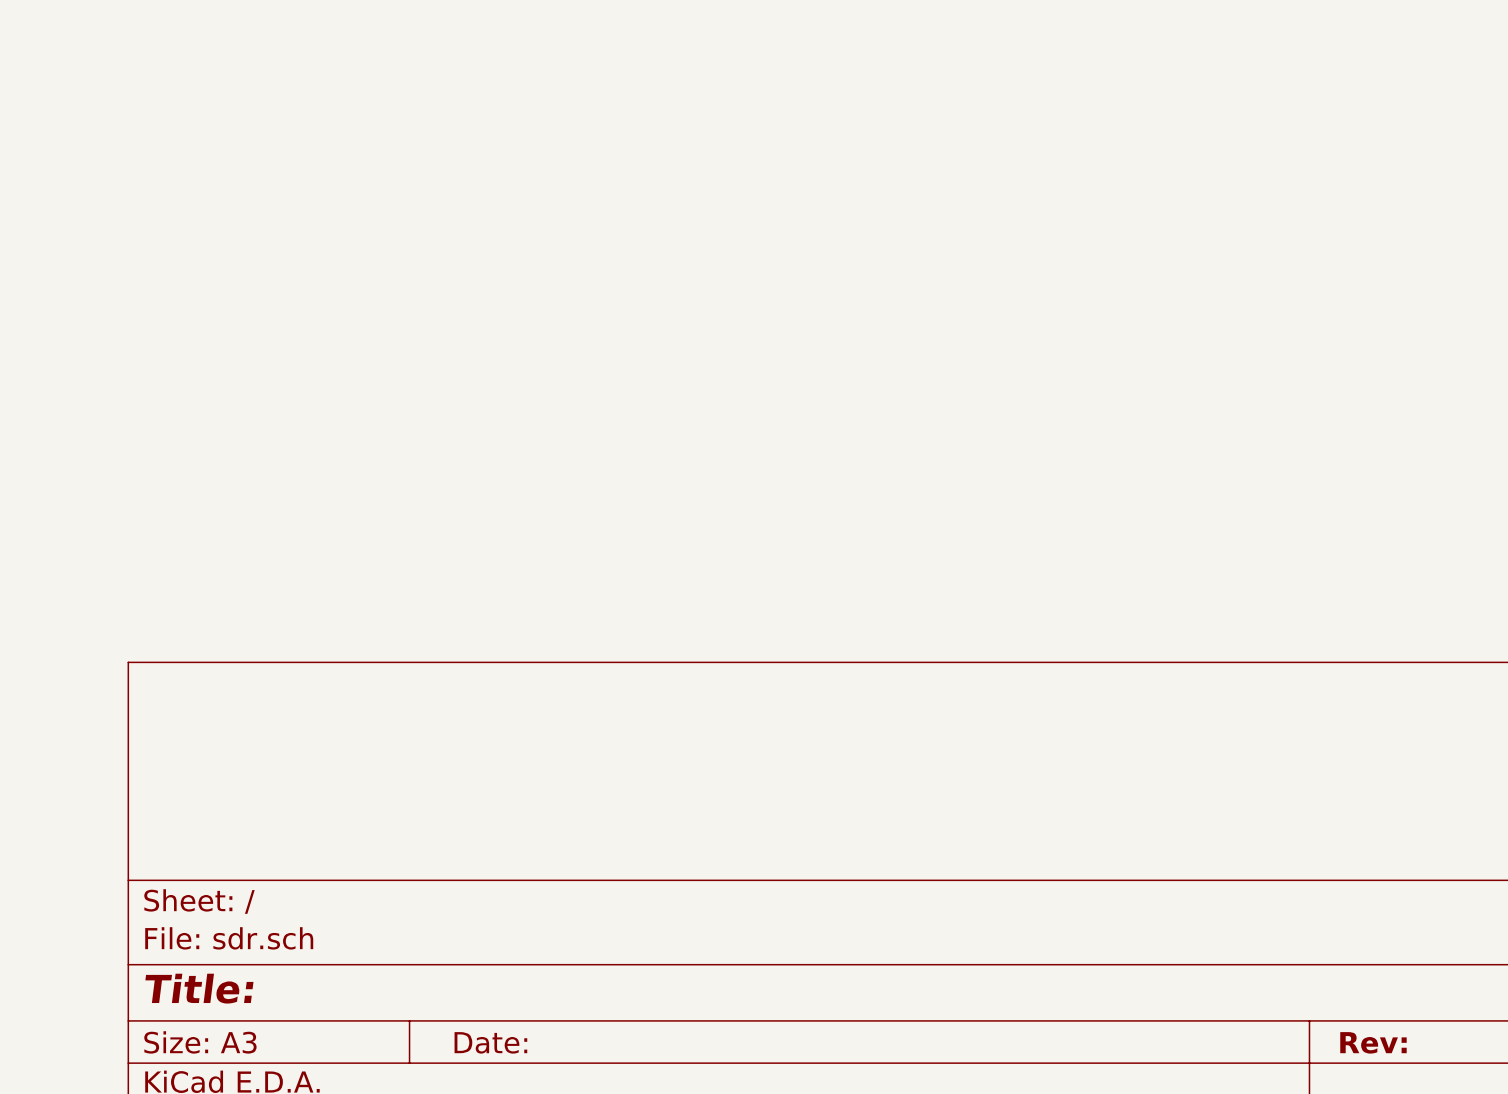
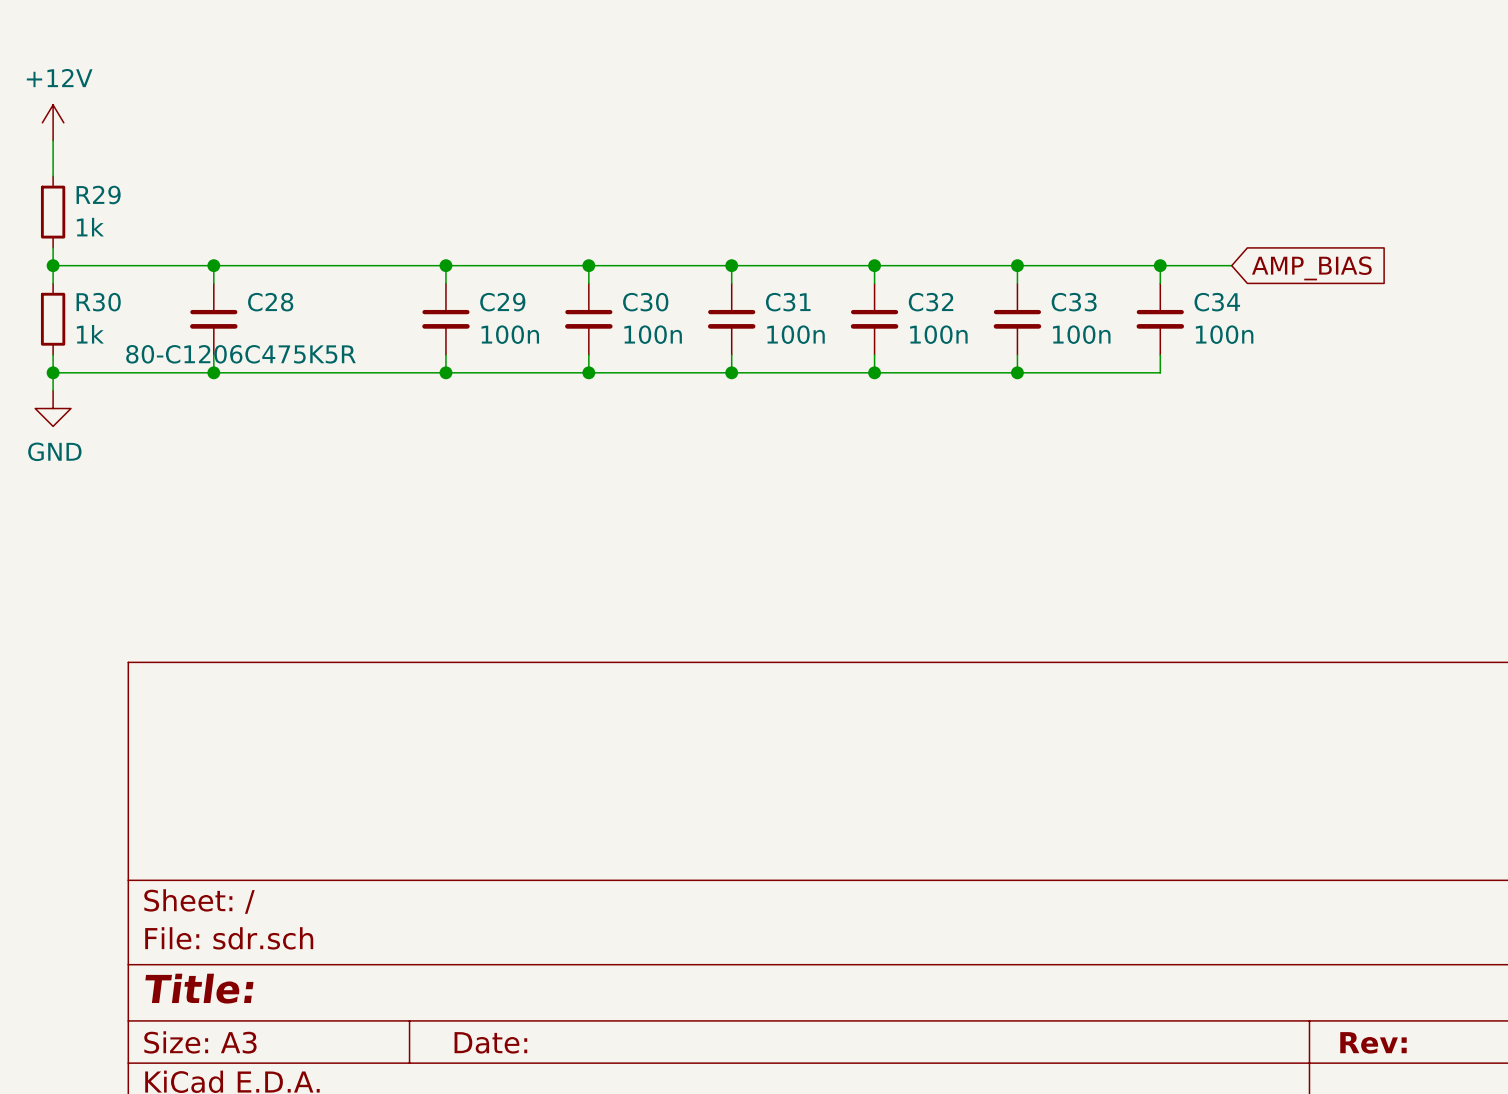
power symbol: none -> +12V (53, 122)
wire: none -> (53, 140) (53, 176)
R29: none -> 1k (53, 212)
wire: none -> (53, 247) (53, 283)
wire: none -> (53, 265) (1231, 265)
junction: none -> (53, 265)
wire: none -> (213, 265) (213, 283)
junction: none -> (213, 265)
wire: none -> (445, 265) (445, 283)
junction: none -> (445, 265)
wire: none -> (588, 265) (588, 283)
junction: none -> (588, 265)
wire: none -> (731, 265) (731, 283)
junction: none -> (731, 265)
wire: none -> (874, 265) (874, 283)
junction: none -> (874, 265)
wire: none -> (1017, 265) (1017, 283)
junction: none -> (1017, 265)
wire: none -> (1160, 265) (1160, 283)
junction: none -> (1160, 265)
global label: none -> AMP_BIAS (1311, 268)
R30: none -> 1k (53, 319)
C28: none -> 80-C1206C475K5R (213, 319)
C29: none -> 100n (445, 319)
C30: none -> 100n (588, 319)
C31: none -> 100n (731, 319)
C32: none -> 100n (874, 319)
C33: none -> 100n (1017, 319)
C34: none -> 100n (1160, 319)
wire: none -> (53, 354) (53, 390)
wire: none -> (213, 354) (213, 372)
wire: none -> (445, 354) (445, 372)
wire: none -> (588, 354) (588, 372)
wire: none -> (731, 354) (731, 372)
wire: none -> (874, 354) (874, 372)
wire: none -> (1017, 354) (1017, 372)
wire: none -> (1160, 354) (1160, 372) (53, 372)
junction: none -> (53, 372)
junction: none -> (213, 372)
junction: none -> (445, 372)
junction: none -> (588, 372)
junction: none -> (731, 372)
junction: none -> (874, 372)
junction: none -> (1017, 372)
power symbol: none -> GND (53, 408)

